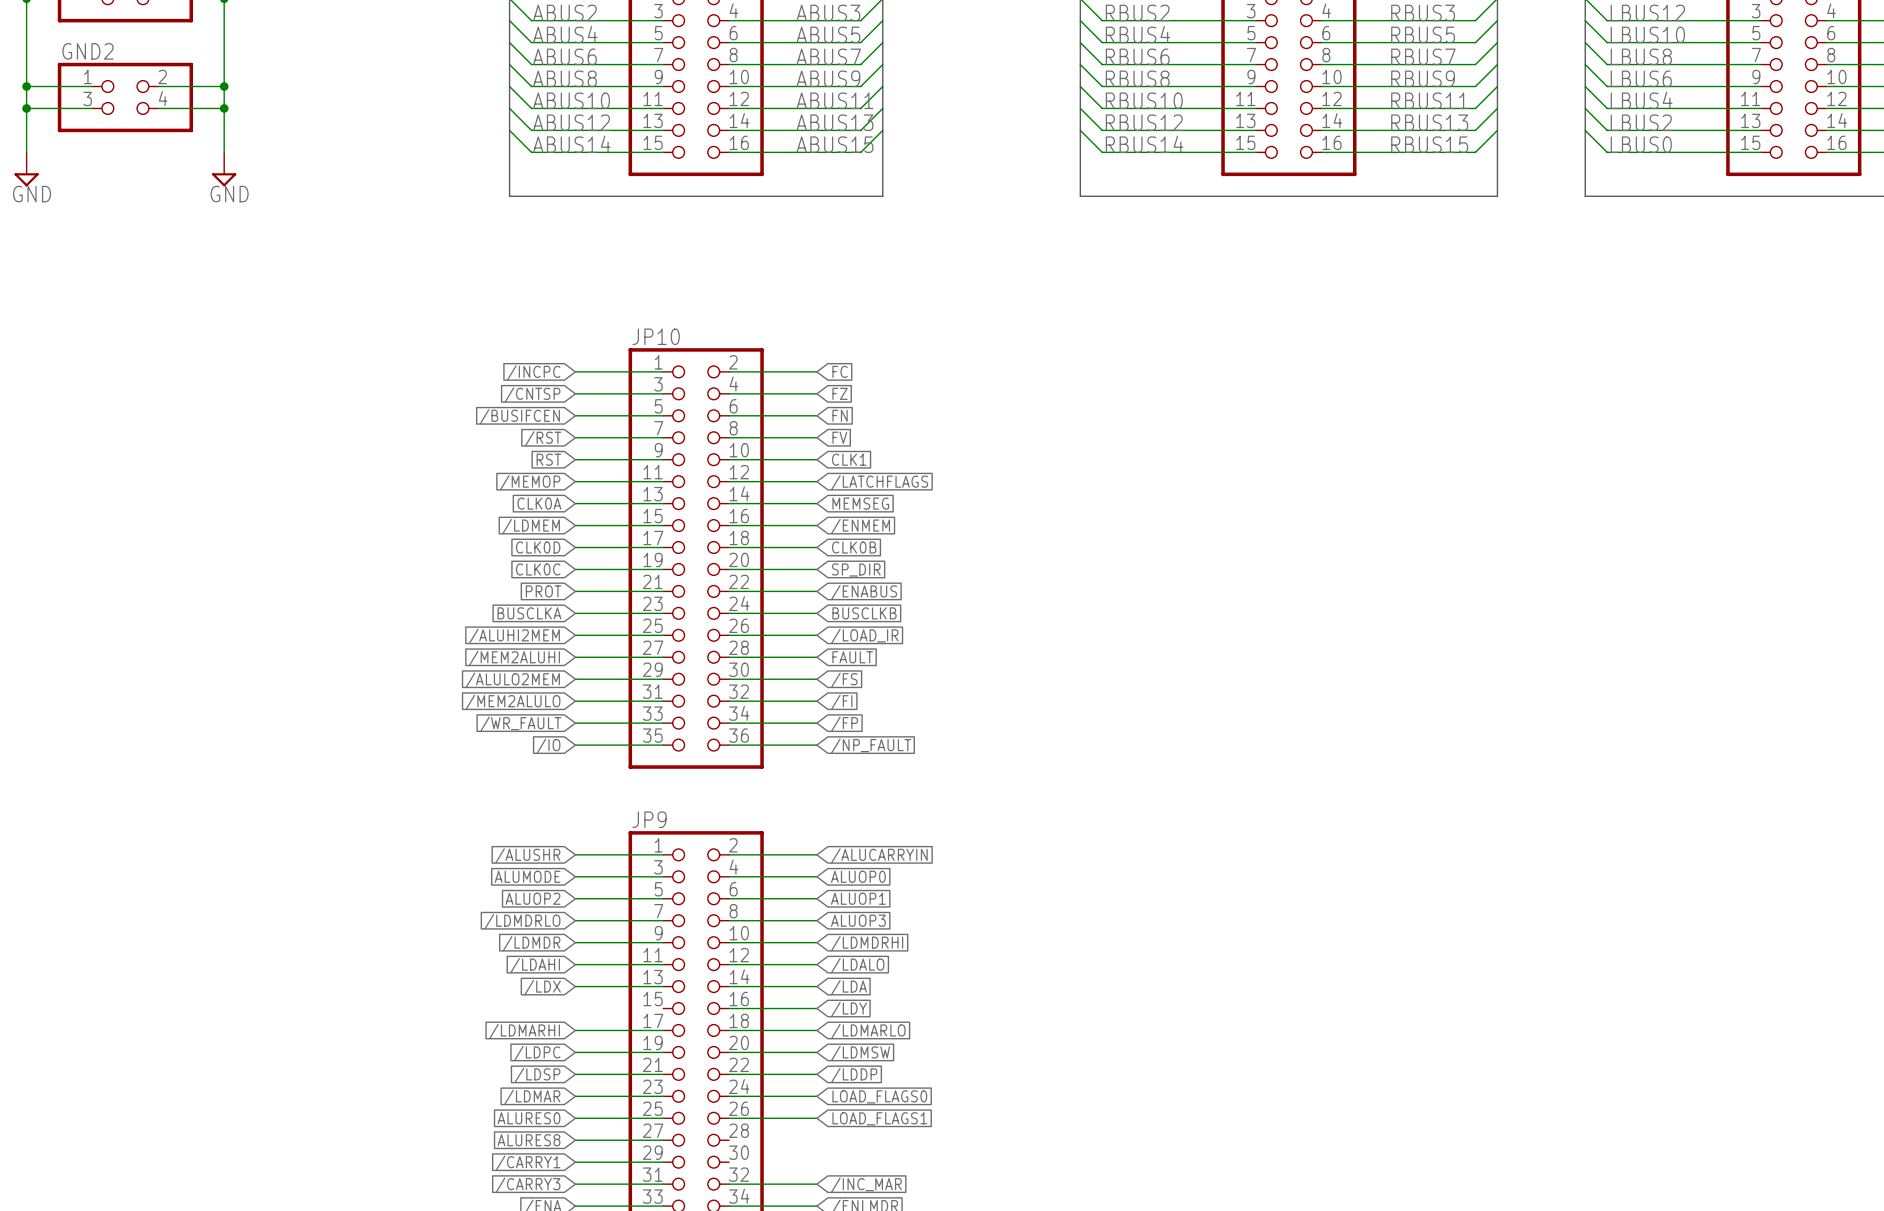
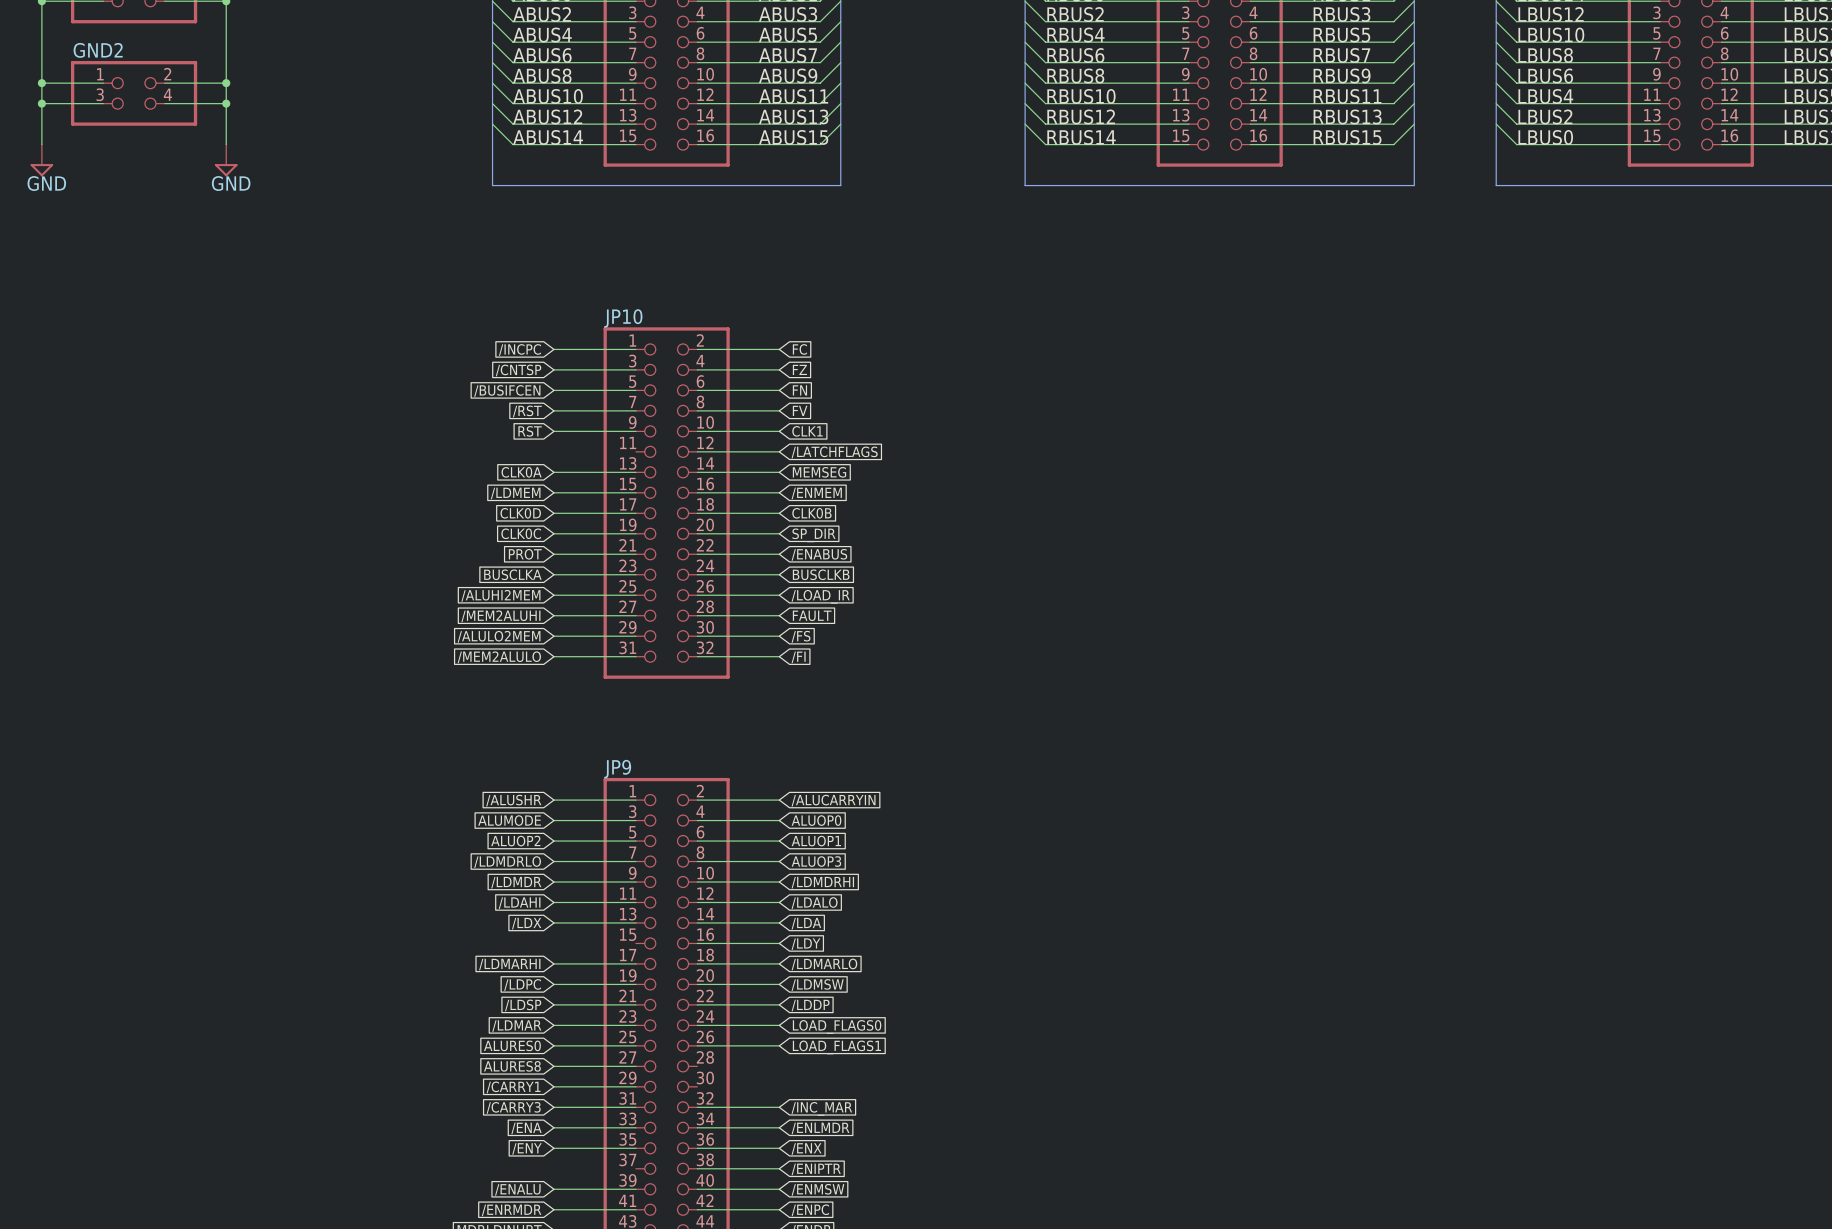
JP10 symbol: [628, 348, 764, 769] -> [603, 327, 730, 679]
wire: (575, 481) (663, 481) -> none
global label: /MEMOP (530, 482) -> none
wire: (575, 723) (663, 723) -> none
wire: (729, 723) (816, 723) -> none
global label: /WR_FAULT (520, 724) -> none
global label: /FP (844, 724) -> none
wire: (575, 745) (663, 745) -> none
wire: (729, 745) (816, 745) -> none
global label: /IO (548, 746) -> none
global label: /NP_FAULT (871, 746) -> none

